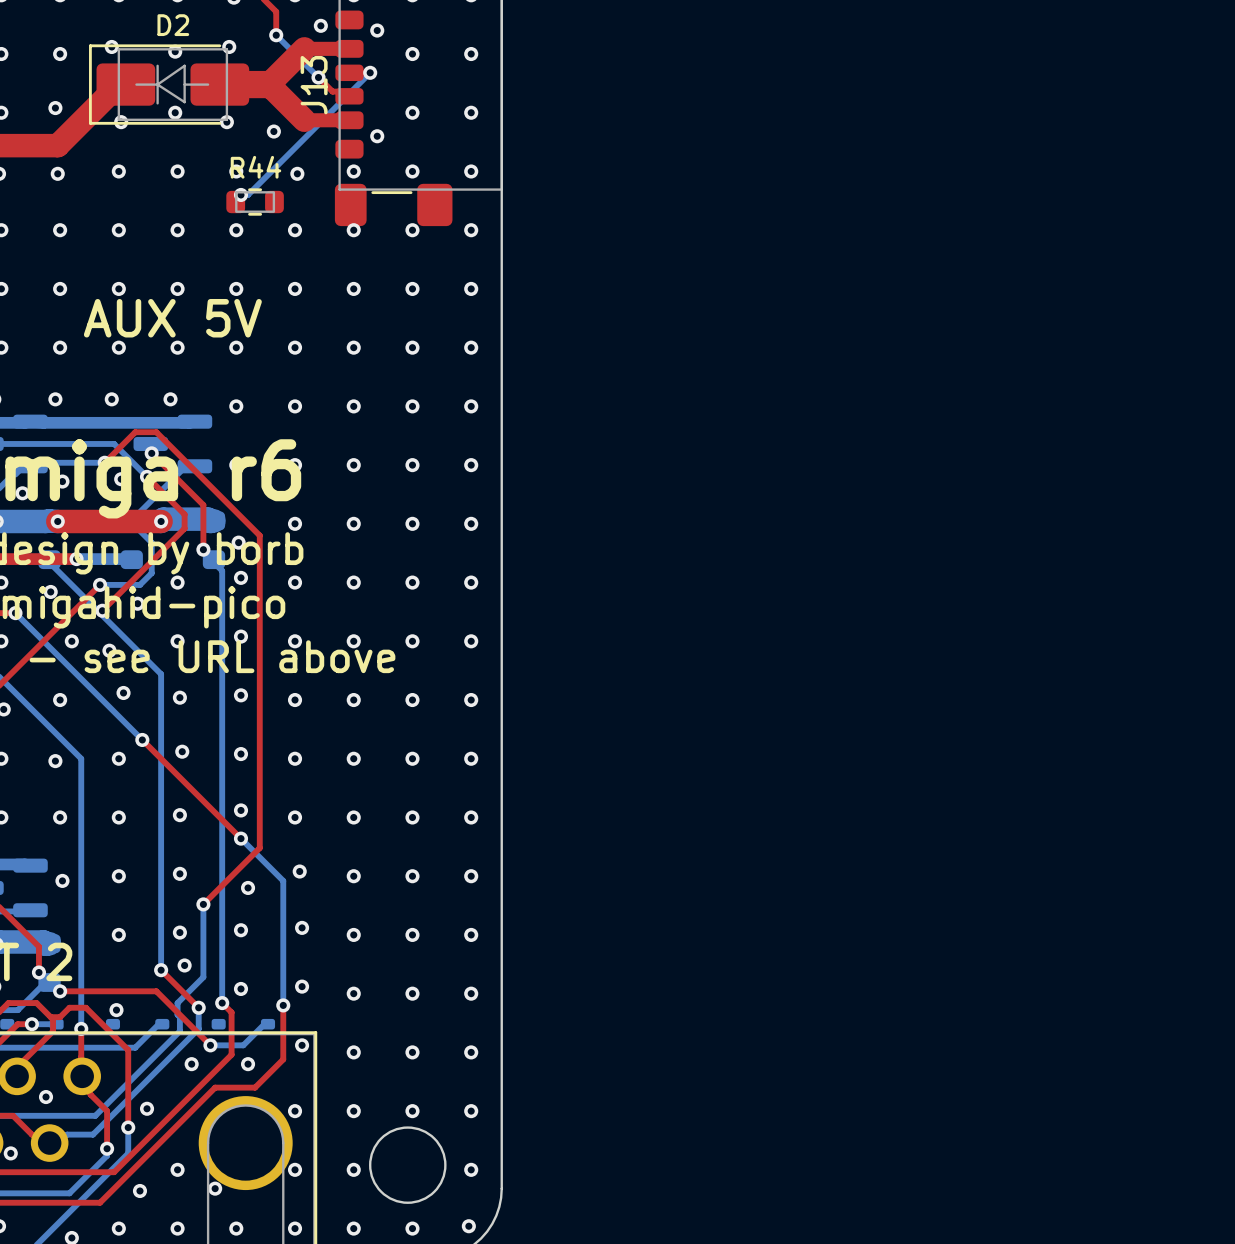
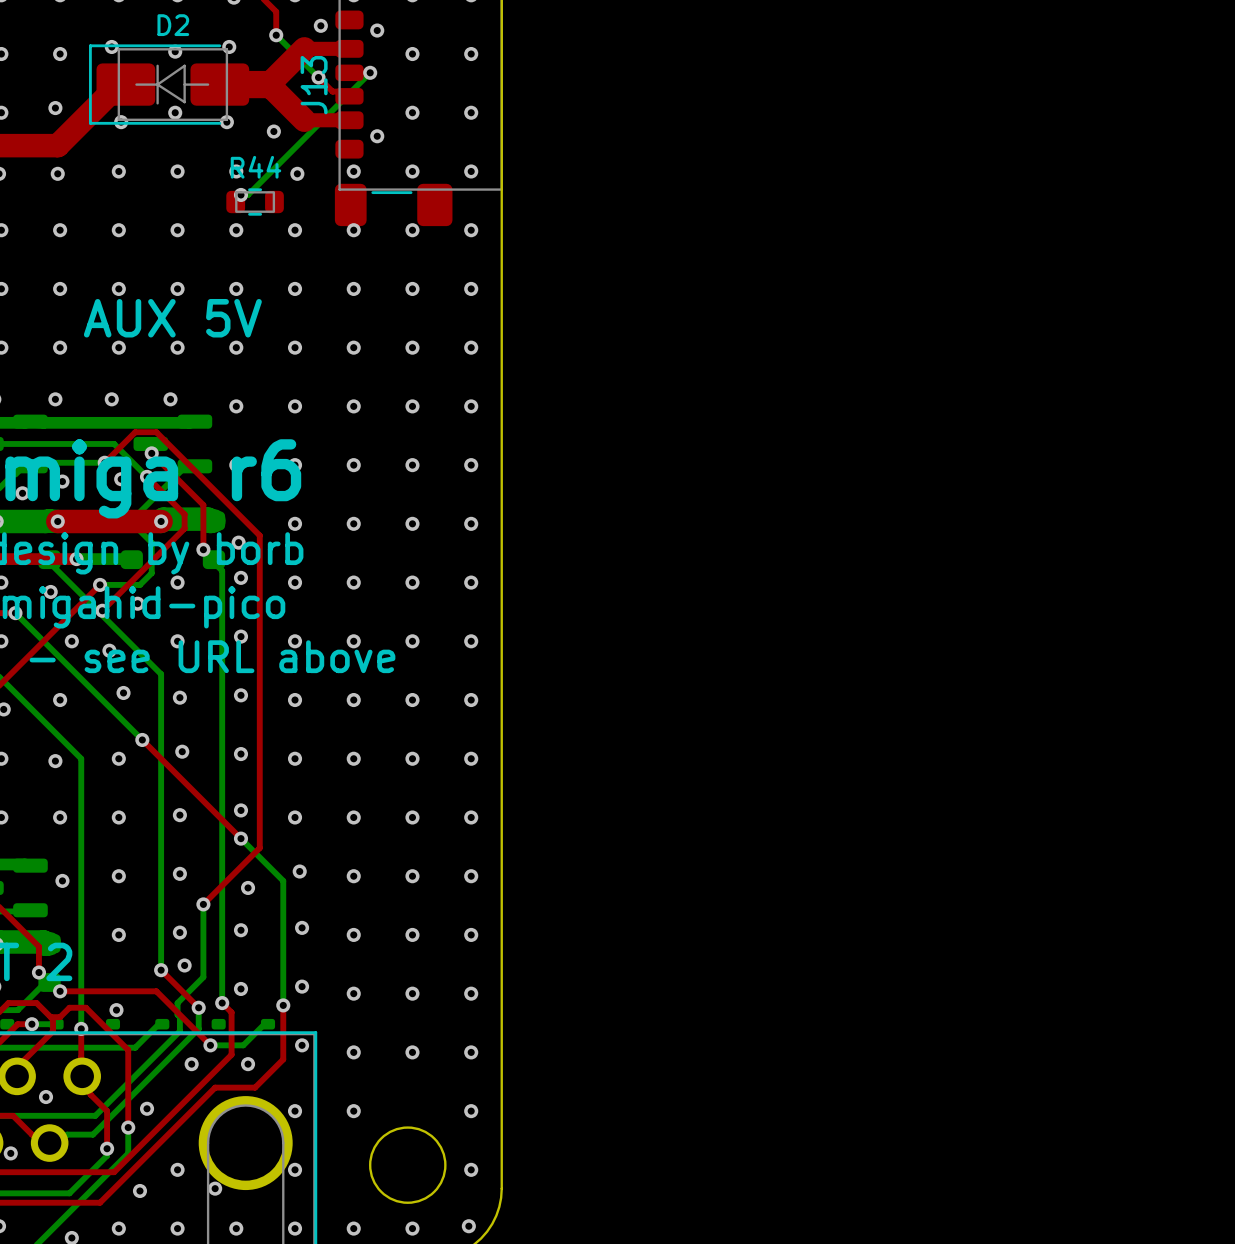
via: (412, 1111) -> none
via: (353, 1169) -> none

